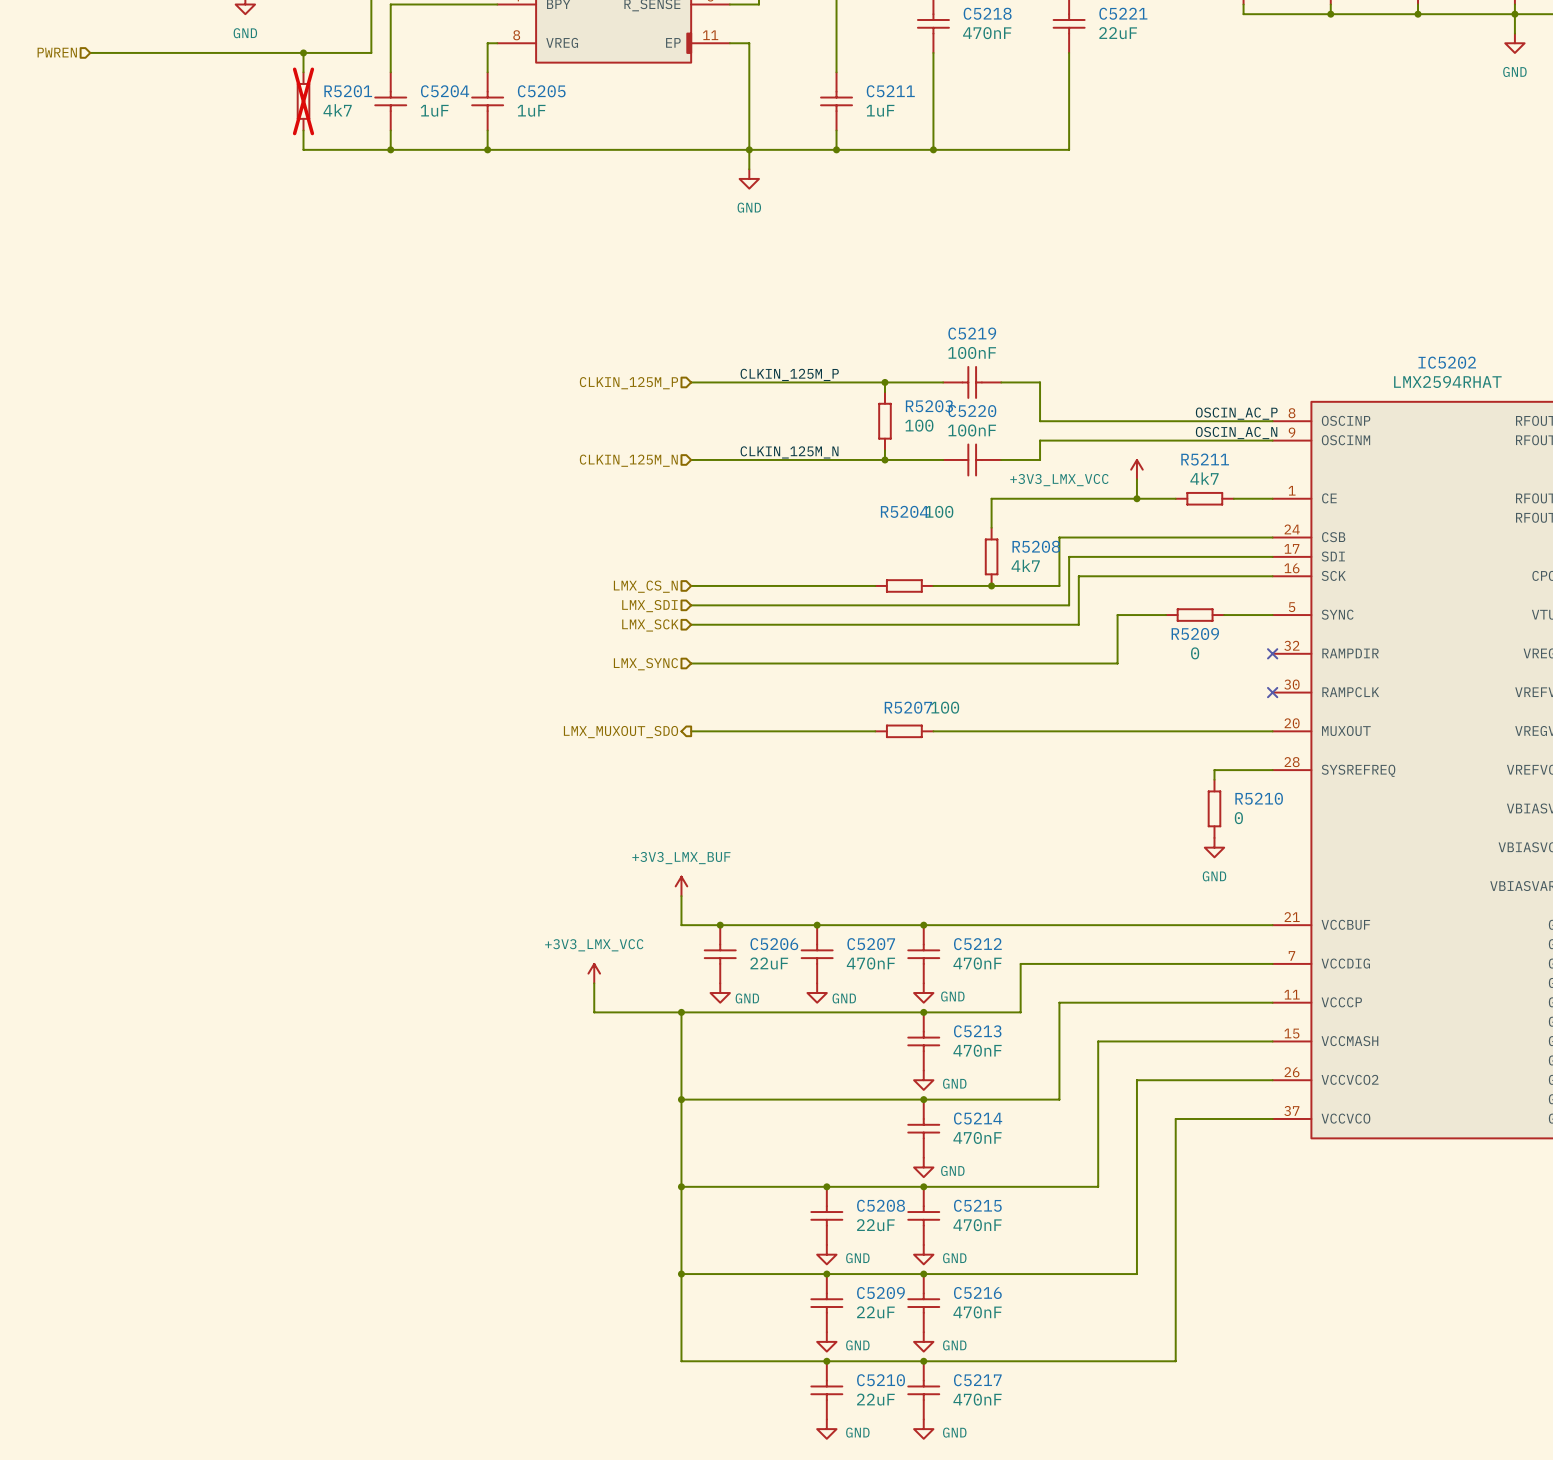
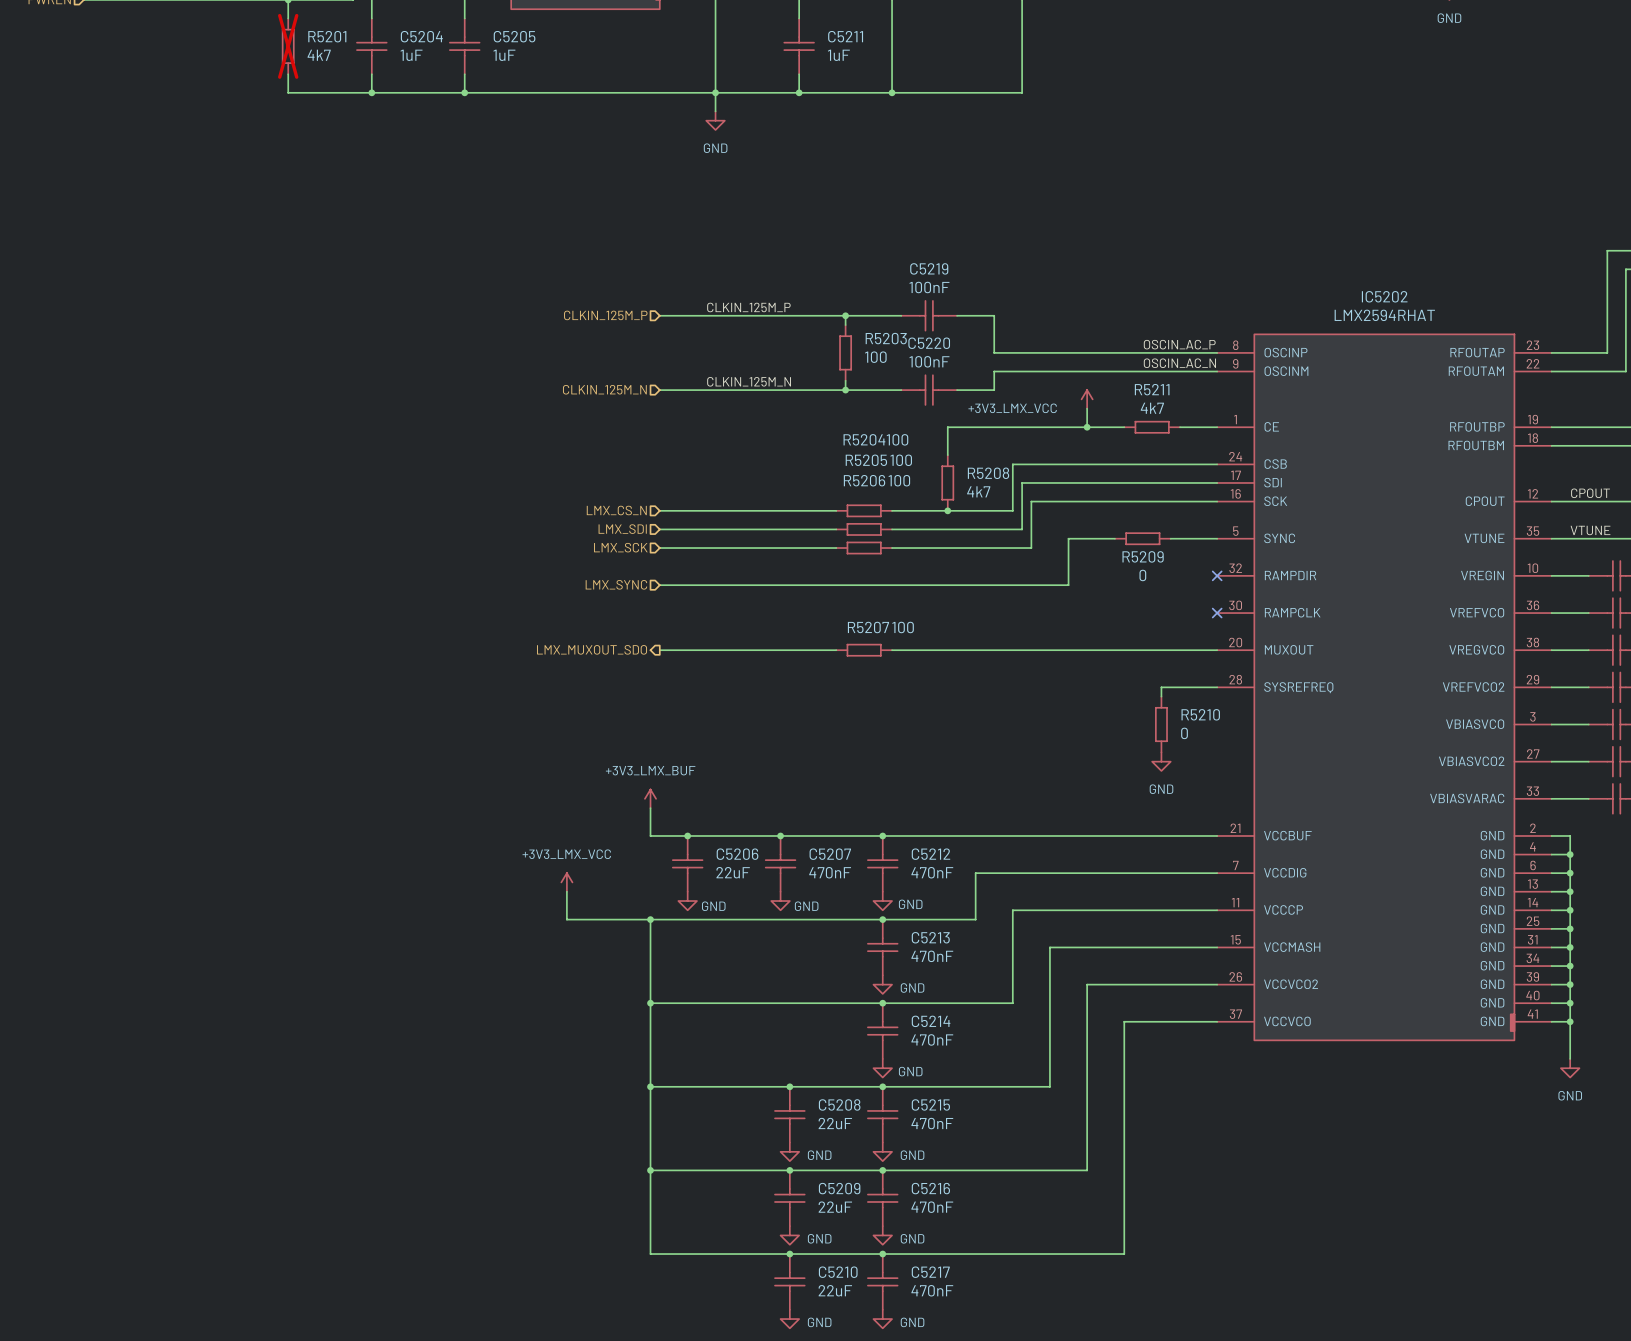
wire: (875, 605) (933, 605) -> none
R5205: none -> 100 (864, 529)
wire: (875, 624) (933, 624) -> none
R5206: none -> 100 (864, 548)

